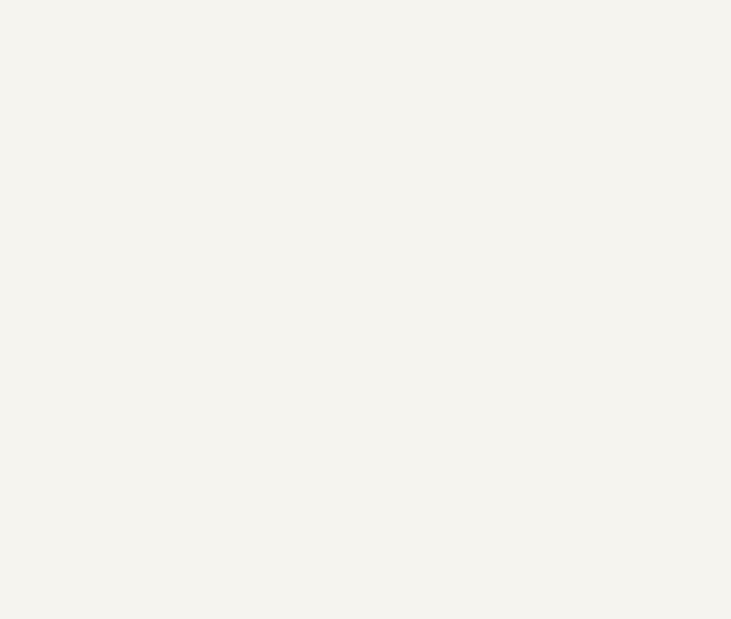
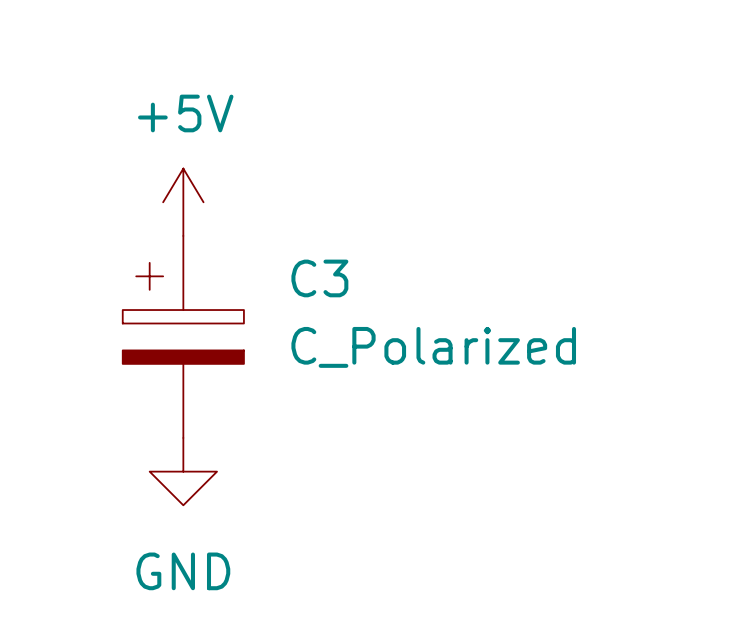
power symbol: none -> +5V (183, 202)
C3: none -> C_Polarized (183, 336)
power symbol: none -> GND (183, 471)

